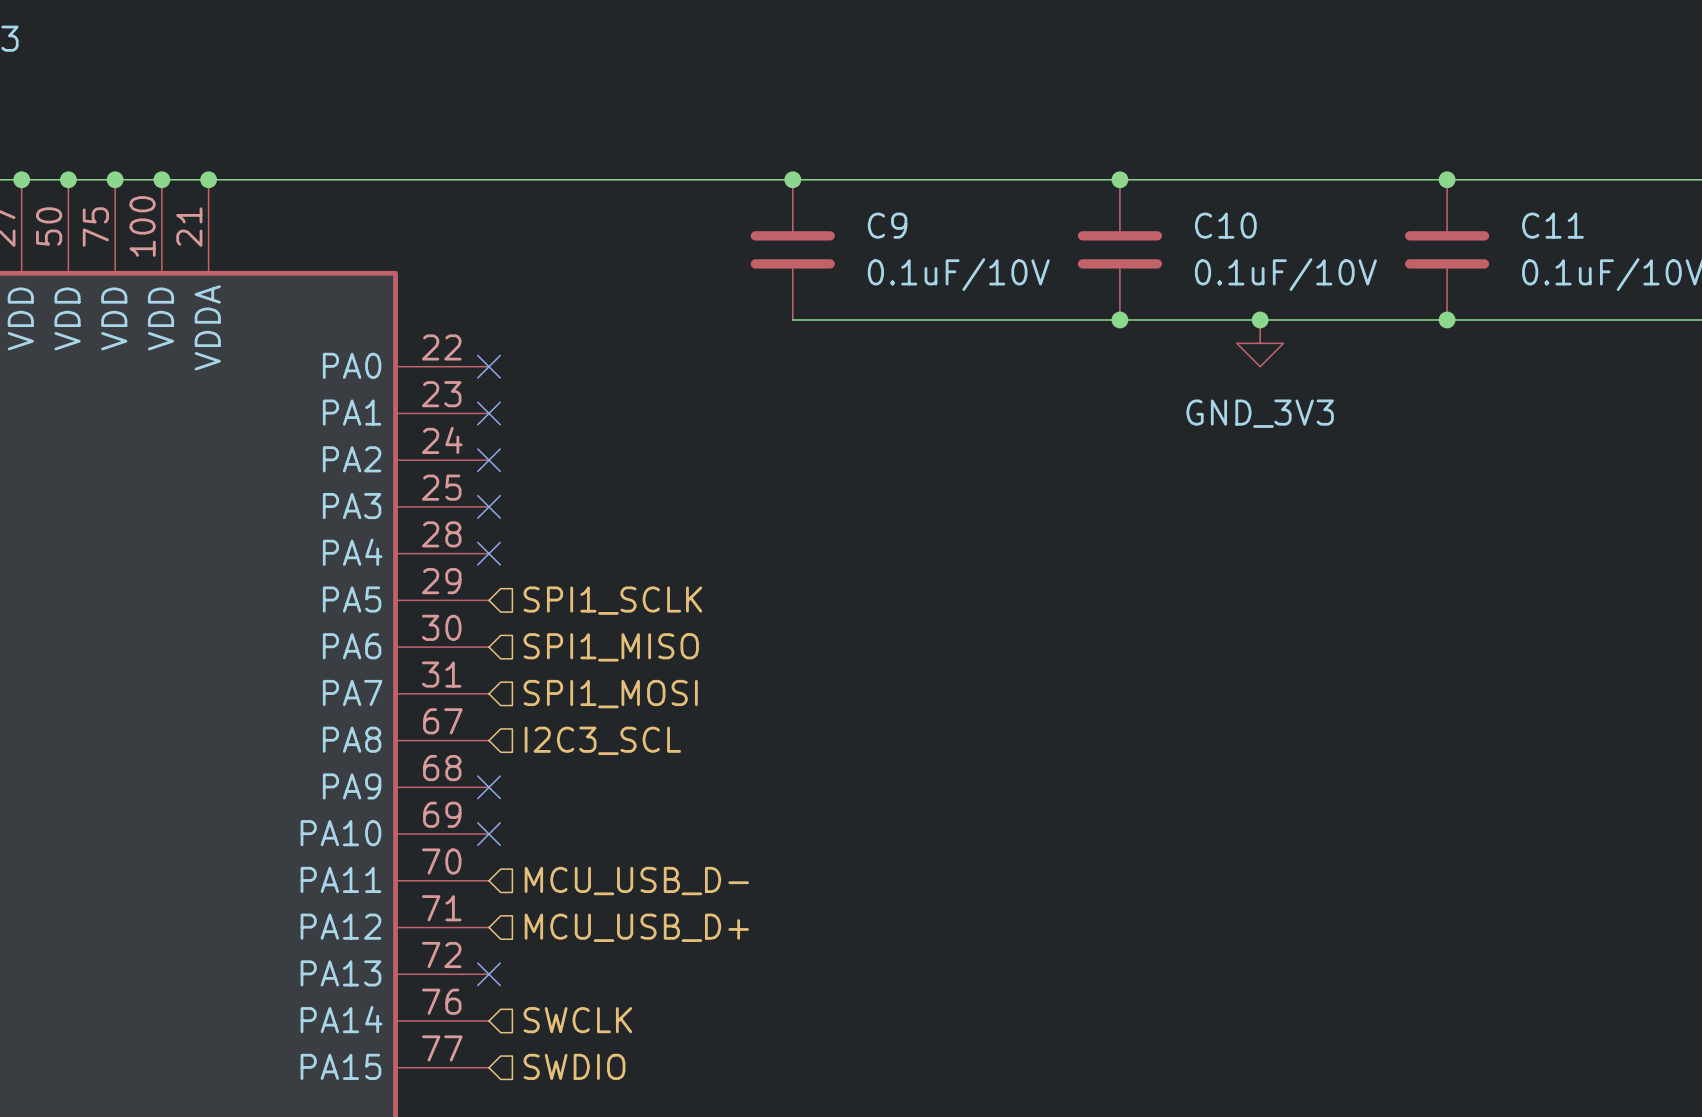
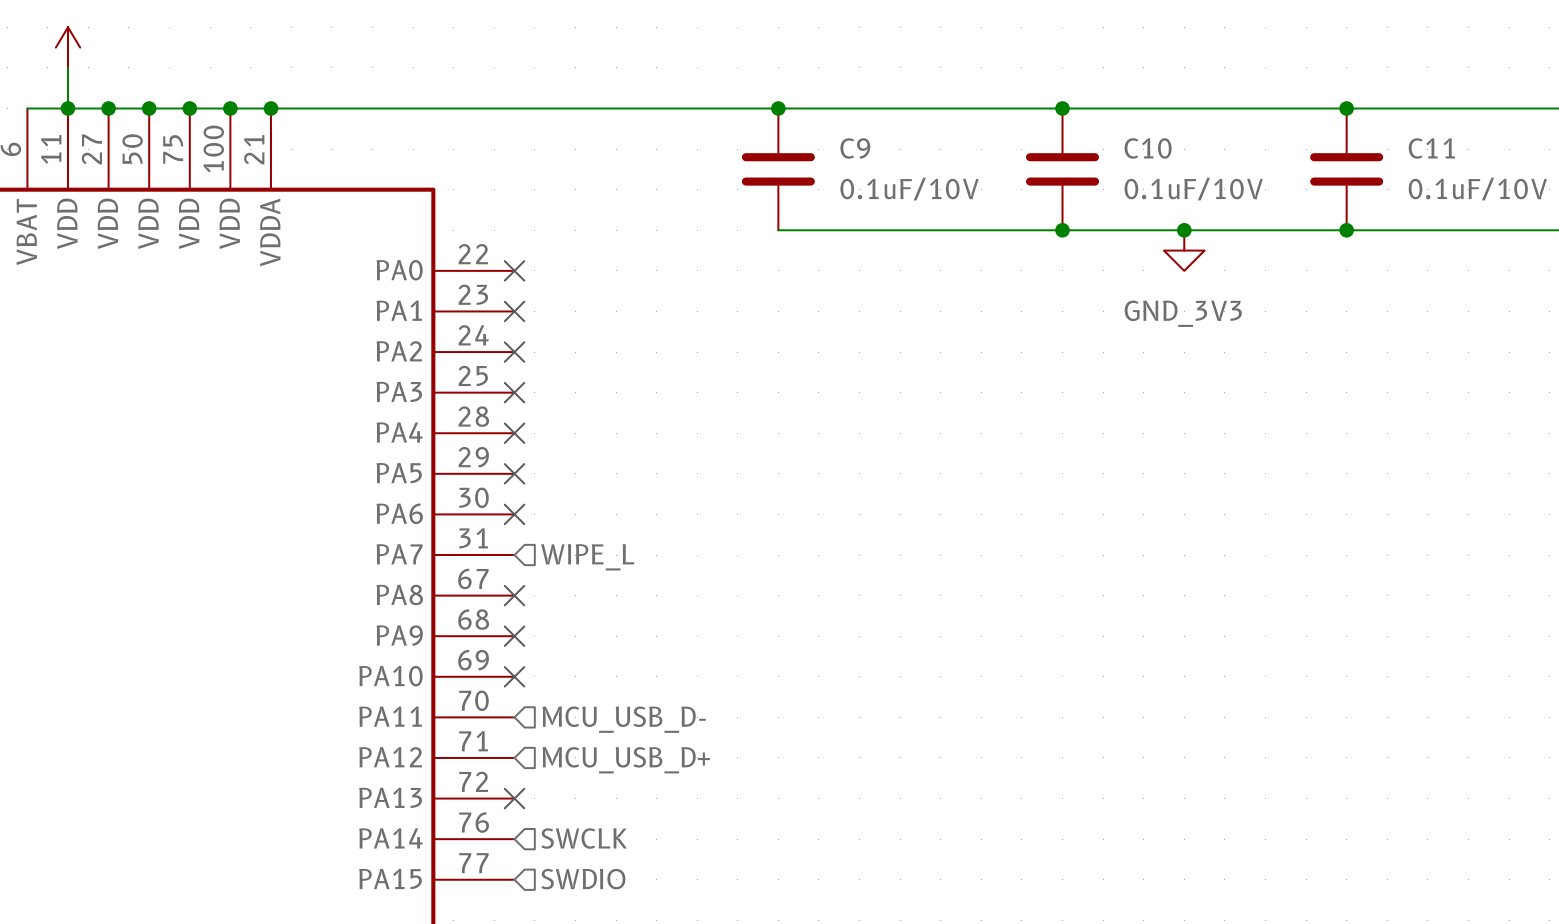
no-connect mark: none -> (514, 473)
hierarchical label: SPI1_SCLK (612, 600) -> none
no-connect mark: none -> (514, 514)
hierarchical label: SPI1_MISO (611, 647) -> none
hierarchical label: SPI1_MOSI (610, 694) -> WIPE_L (587, 557)
no-connect mark: none -> (514, 595)
hierarchical label: I2C3_SCL (602, 740) -> none

